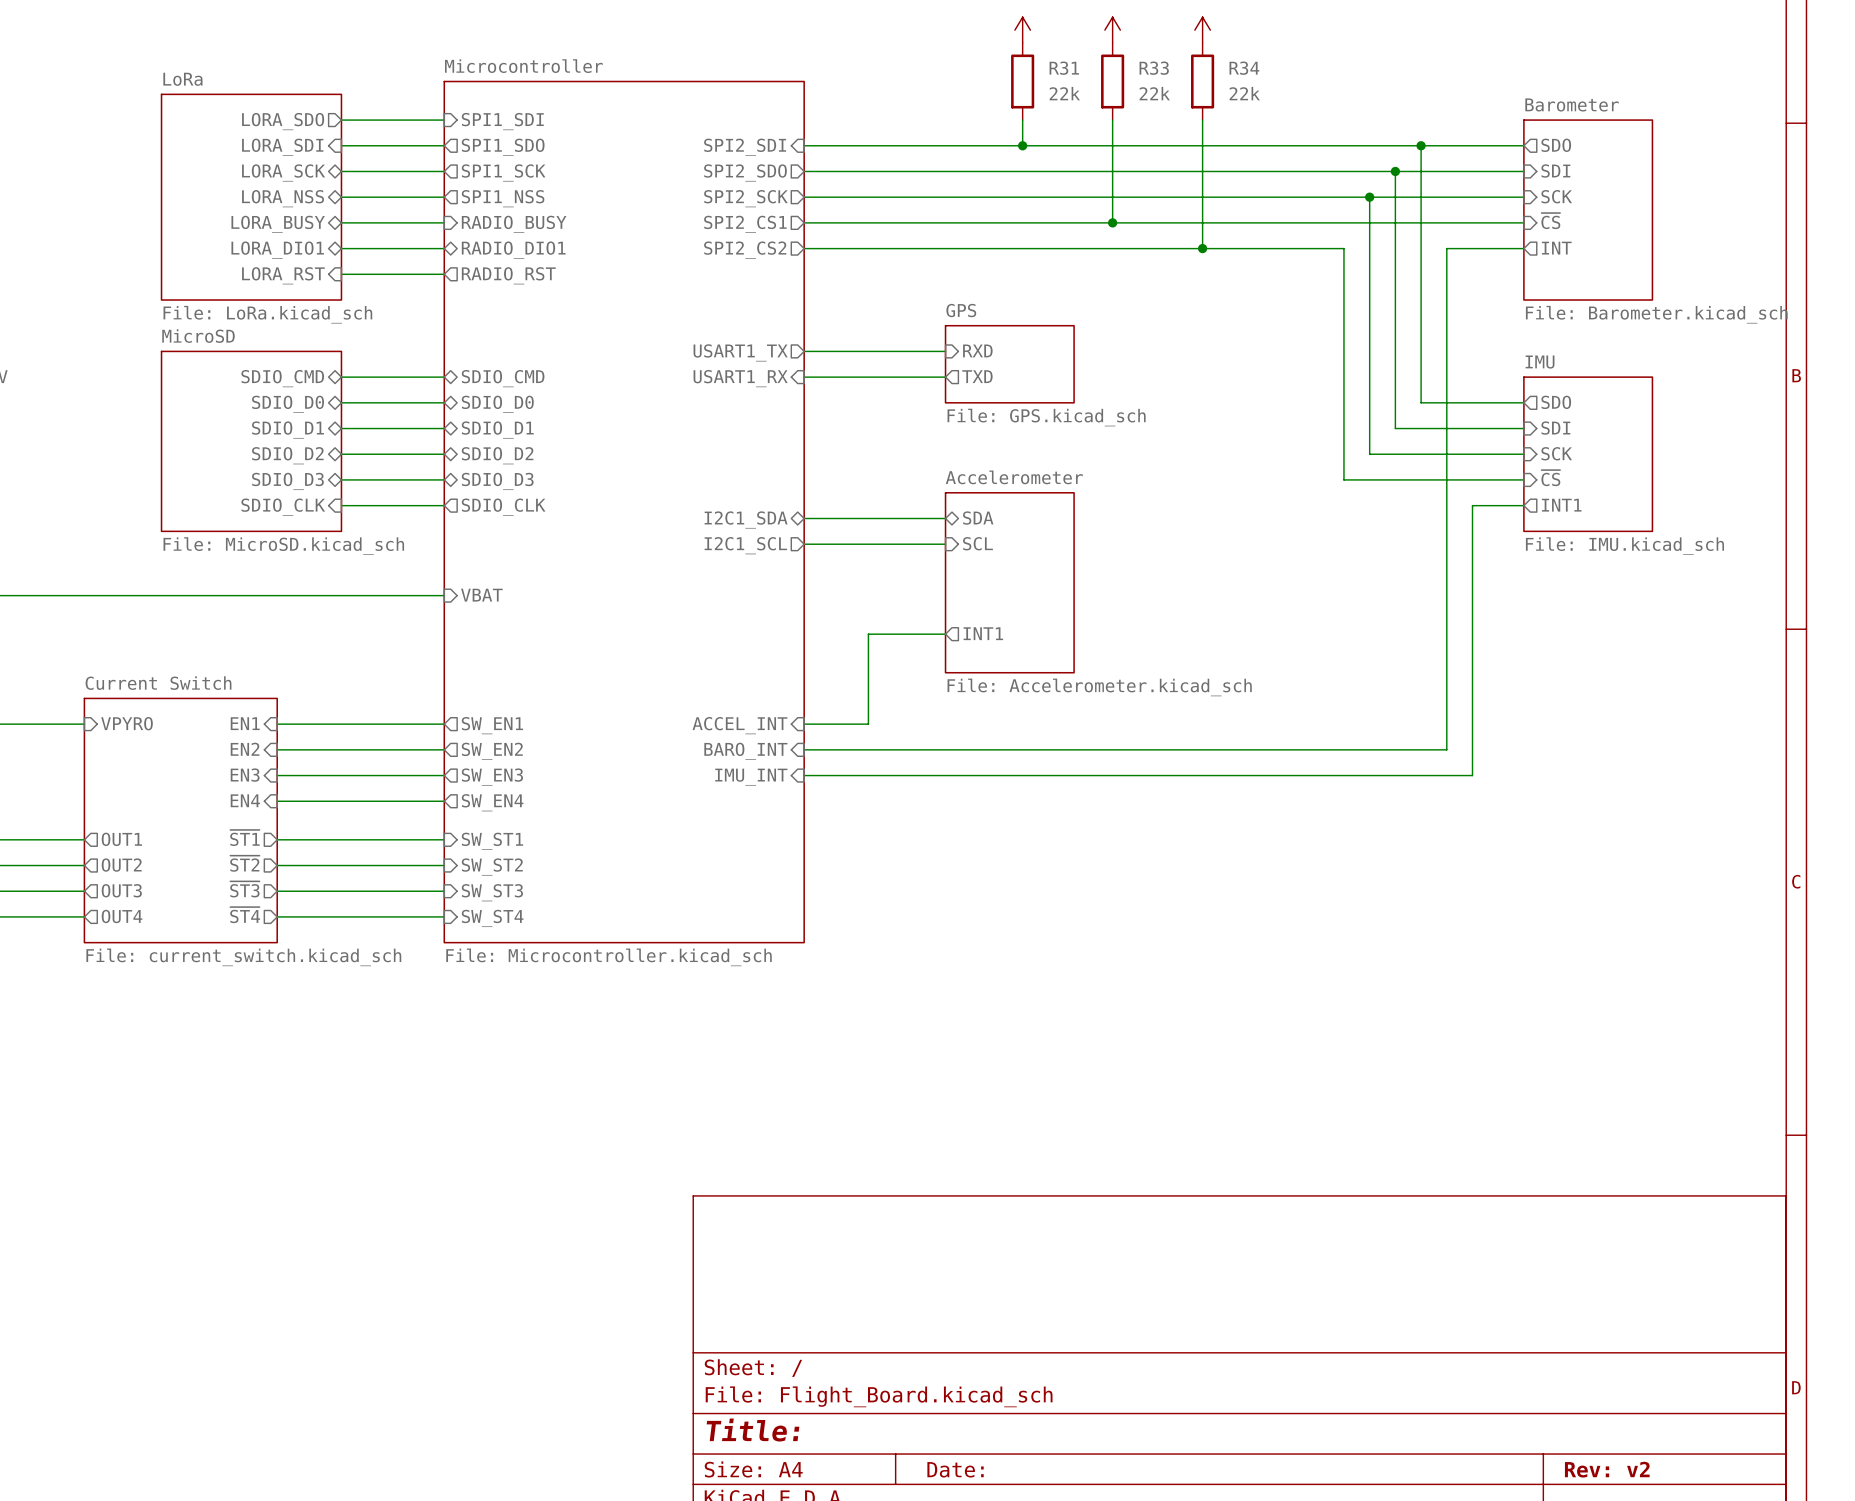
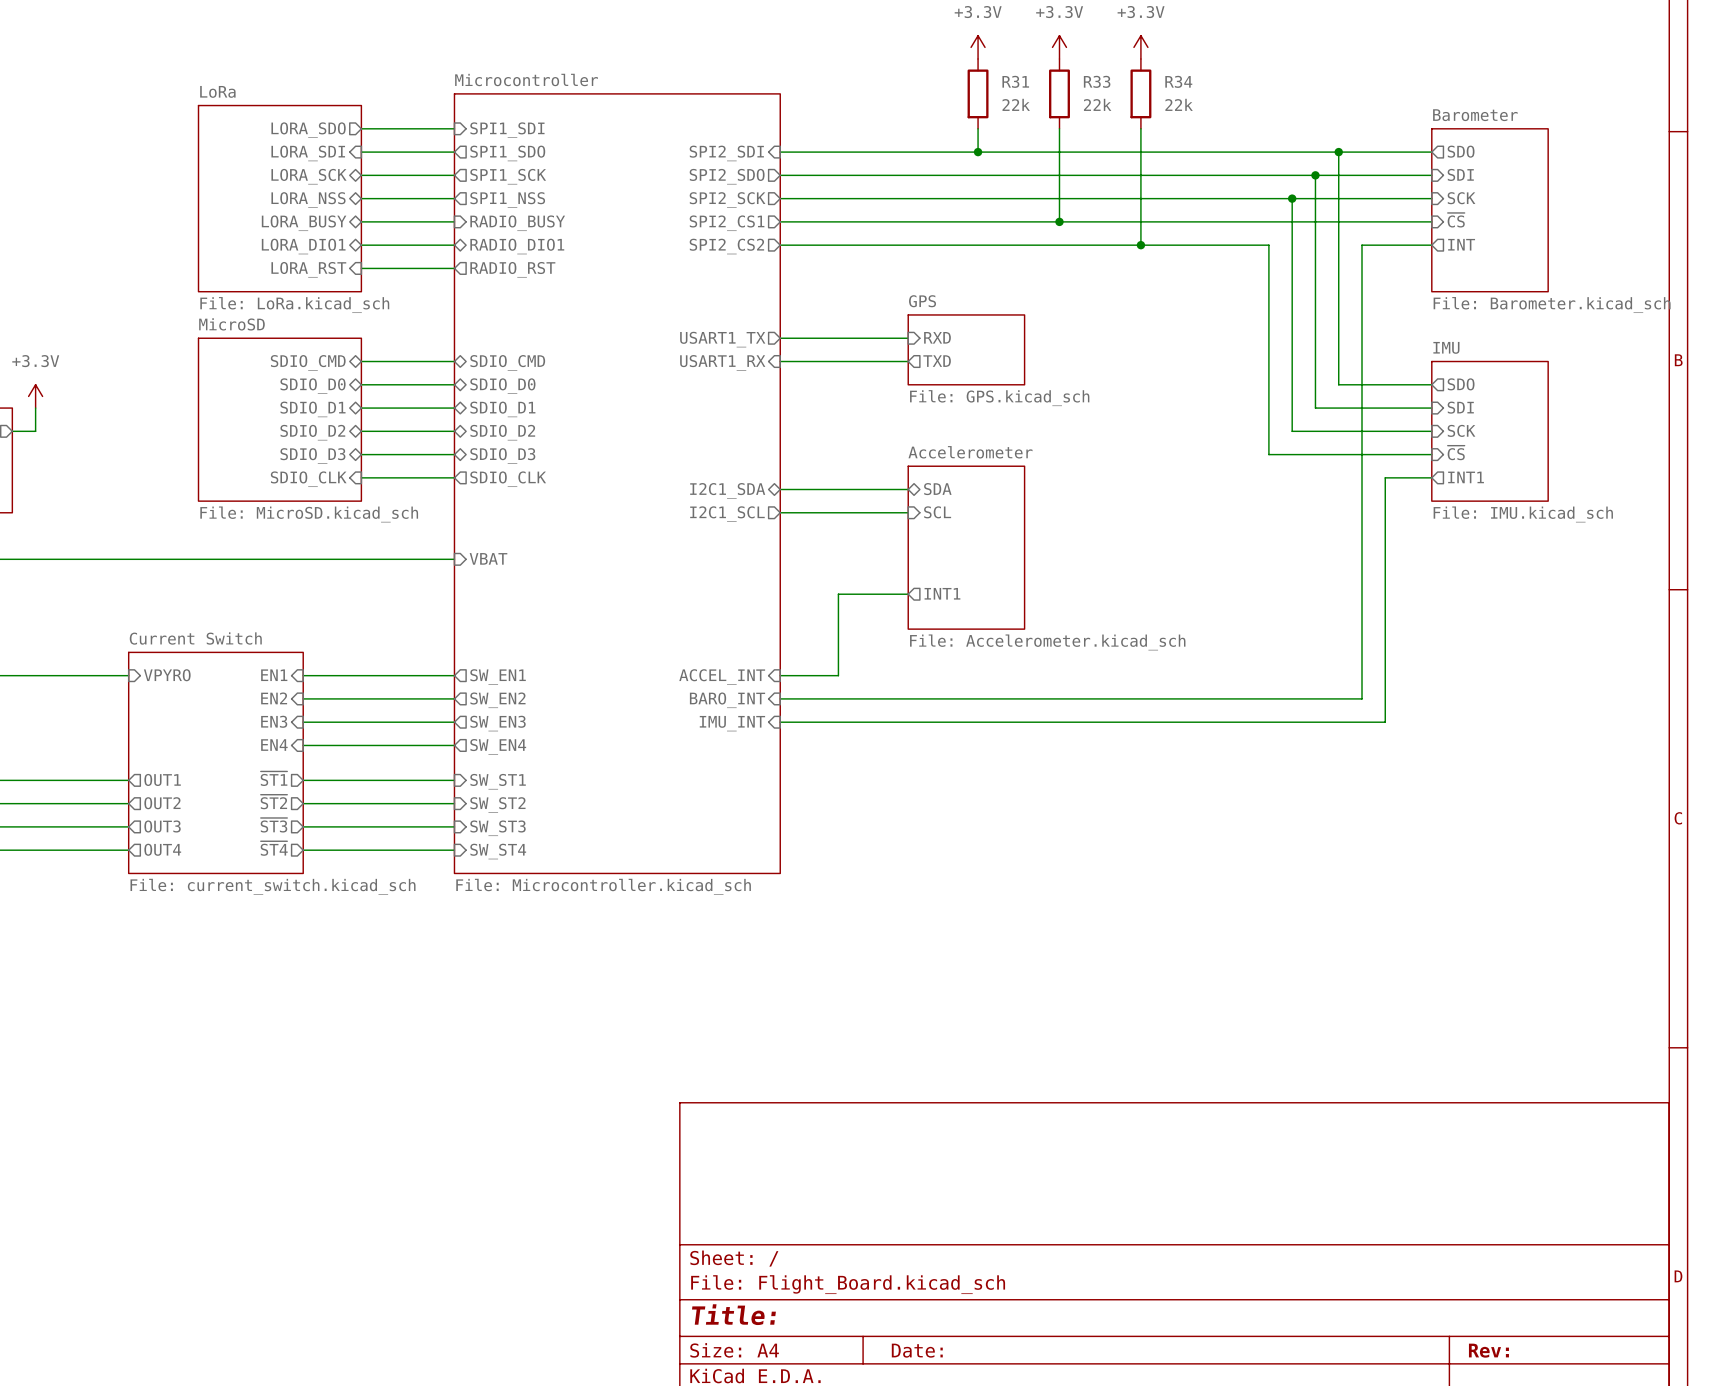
title block: Rev: v2 (1607, 1469) -> Rev: (1488, 1350)

